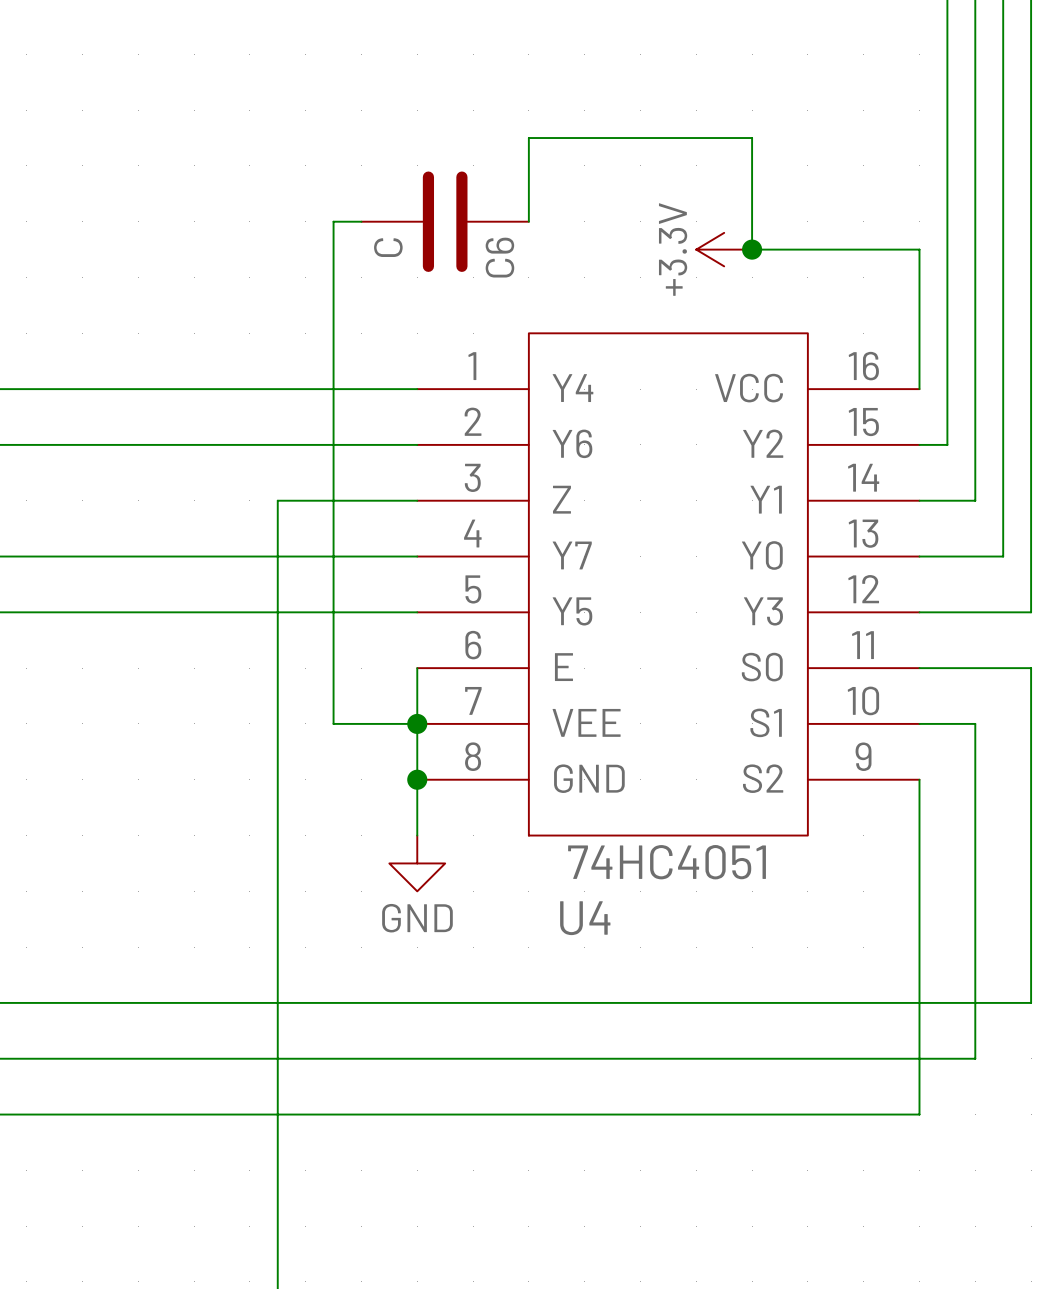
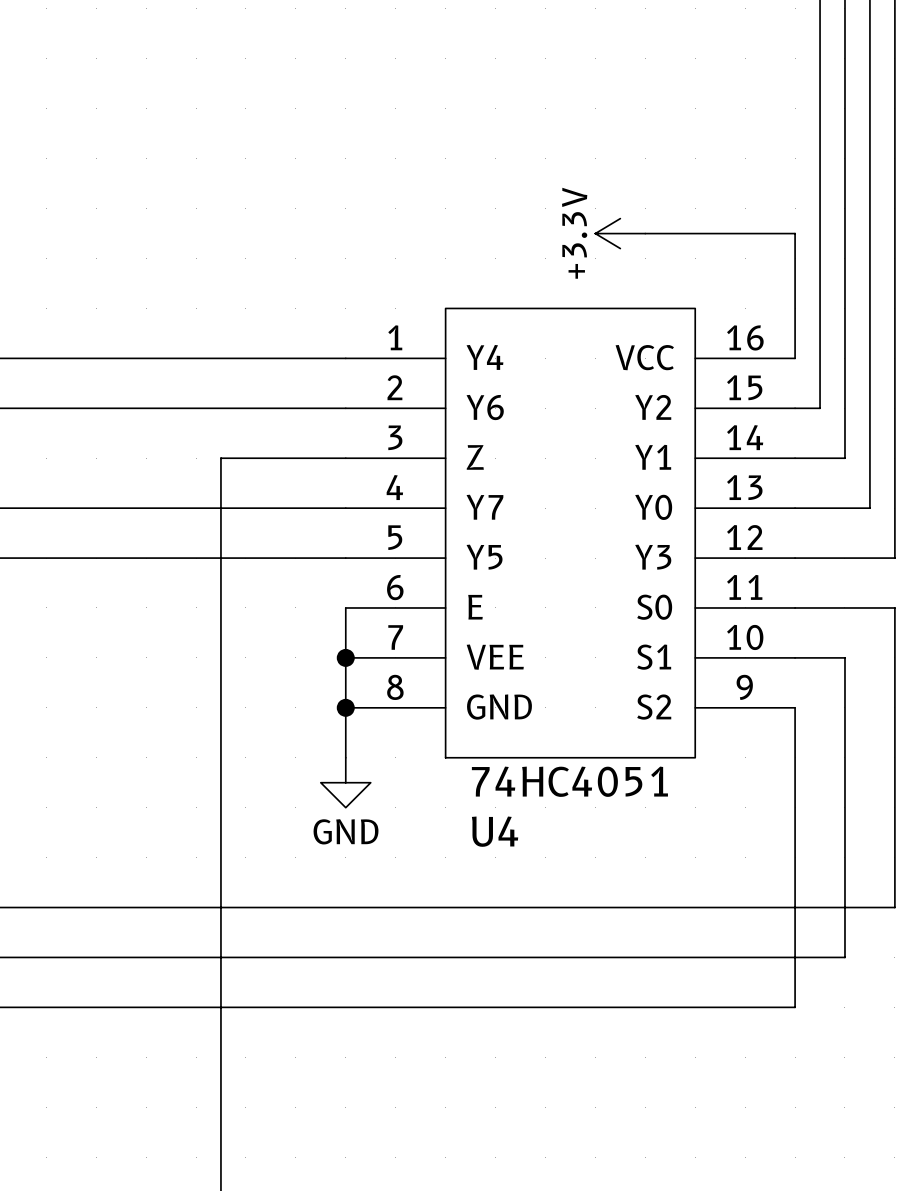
wire: (361, 221) (333, 221) (333, 723) (417, 723) -> none
C6: C (445, 221) -> none
wire: (528, 221) (528, 138) (752, 138) (752, 249) -> none
junction: (752, 249) -> none

